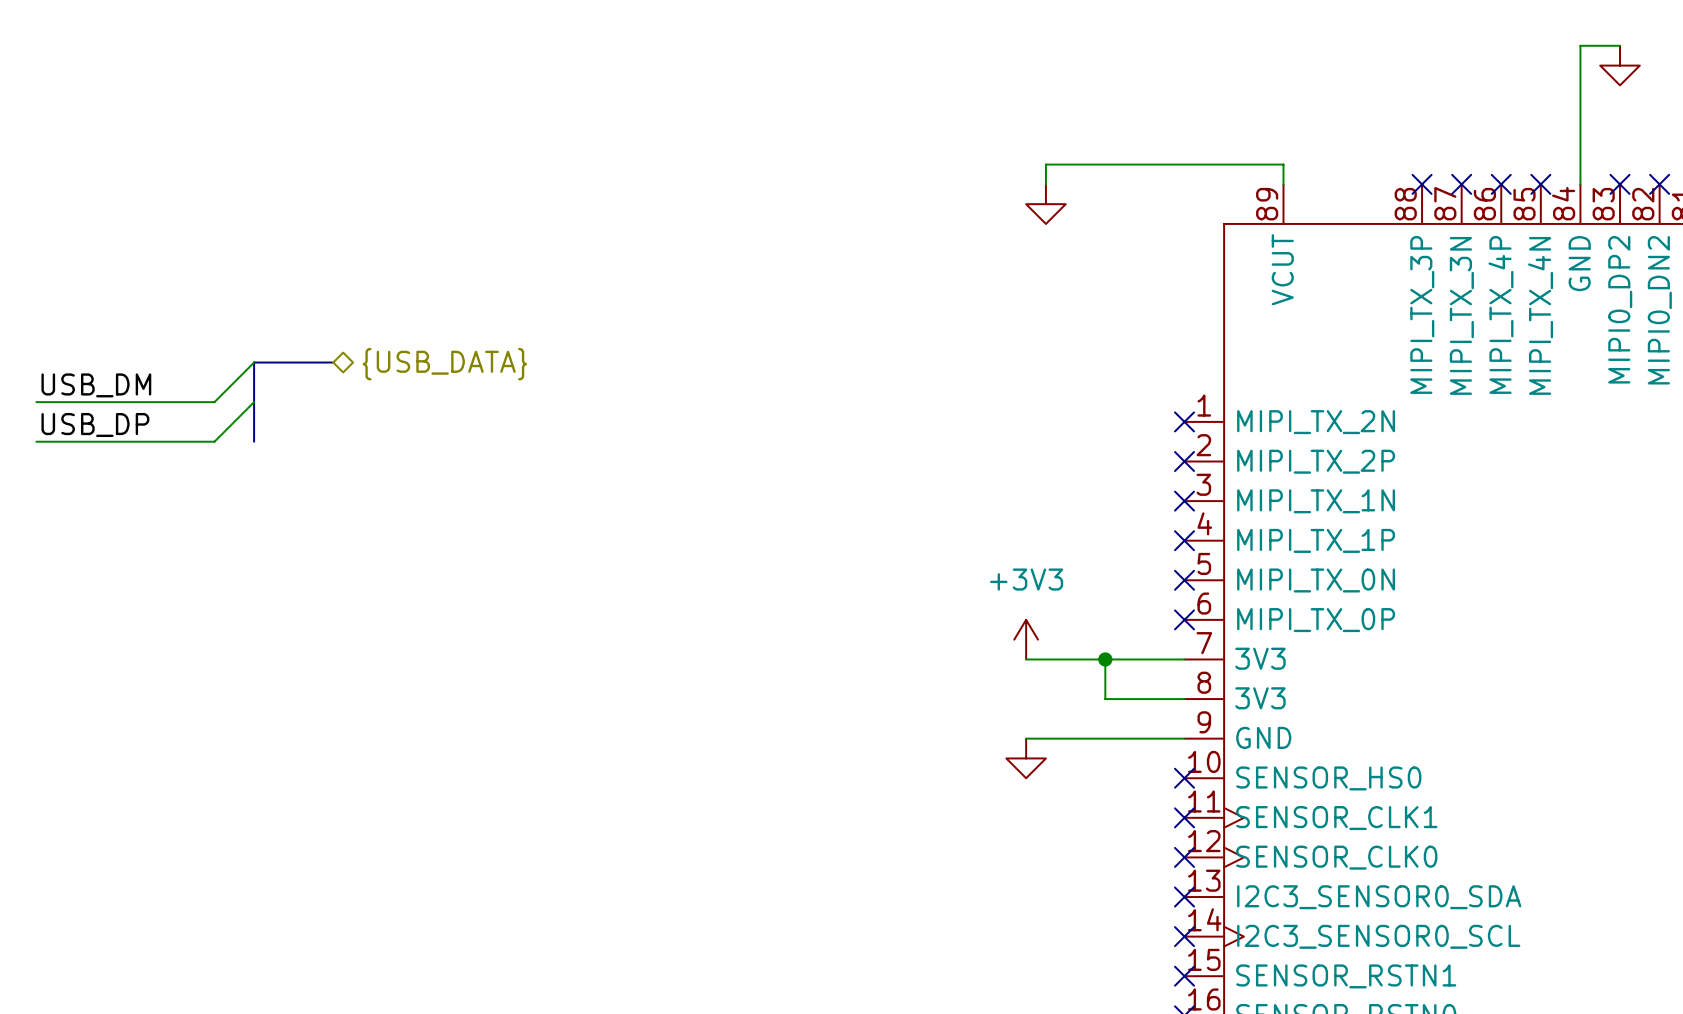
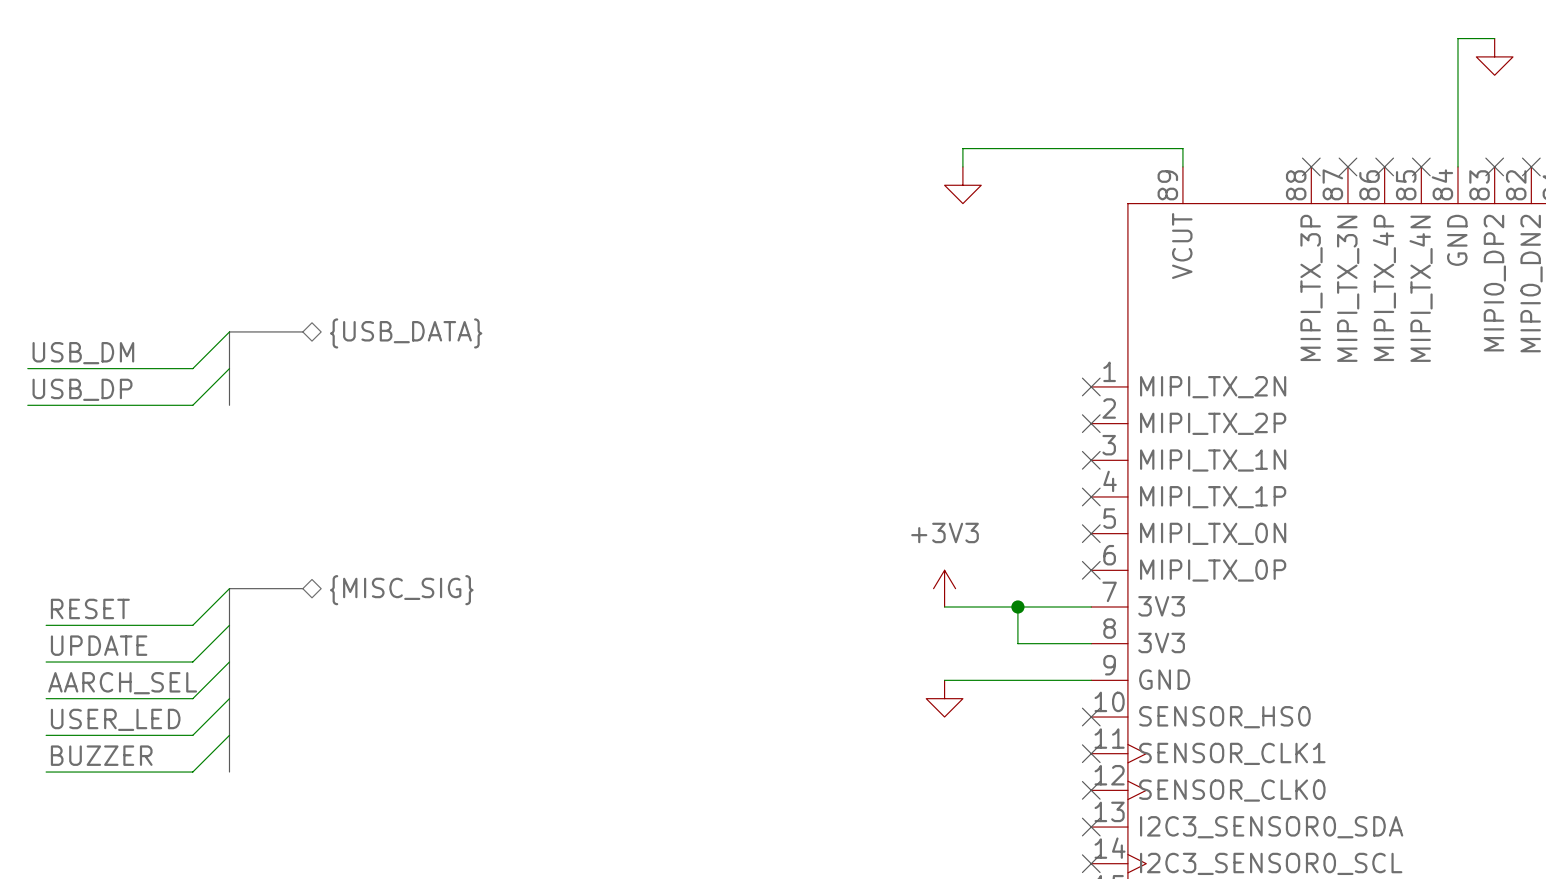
wire: none -> (229, 588) (192, 625) (46, 625)
bus: none -> (302, 588) (229, 588) (229, 772)
hierarchical label: none -> {MISC_SIG} (401, 590)
label: none -> RESET (90, 608)
wire: none -> (229, 625) (192, 662) (46, 662)
label: none -> UPDATE (99, 645)
wire: none -> (229, 662) (192, 698) (46, 698)
label: none -> AARCH_SEL (122, 683)
wire: none -> (229, 698) (192, 735) (46, 735)
label: none -> USER_LED (115, 719)
wire: none -> (229, 735) (192, 772) (46, 772)
label: none -> BUZZER (101, 755)

